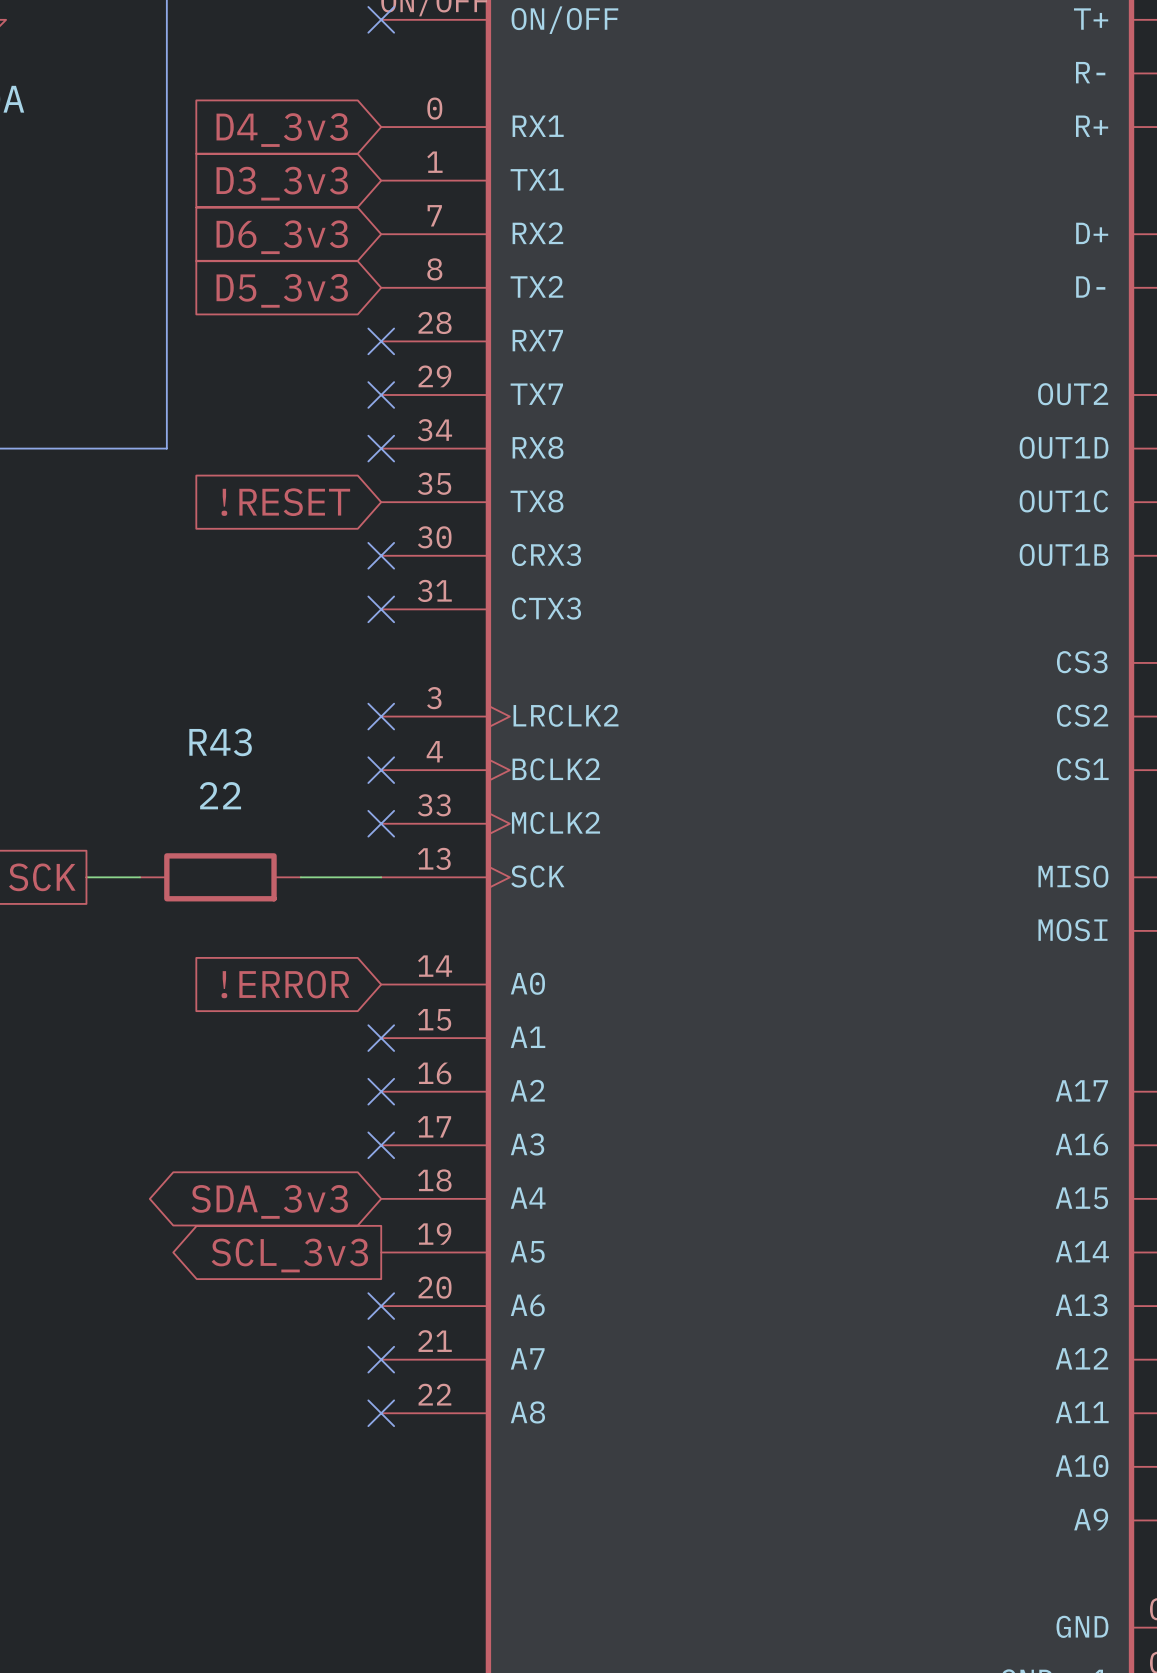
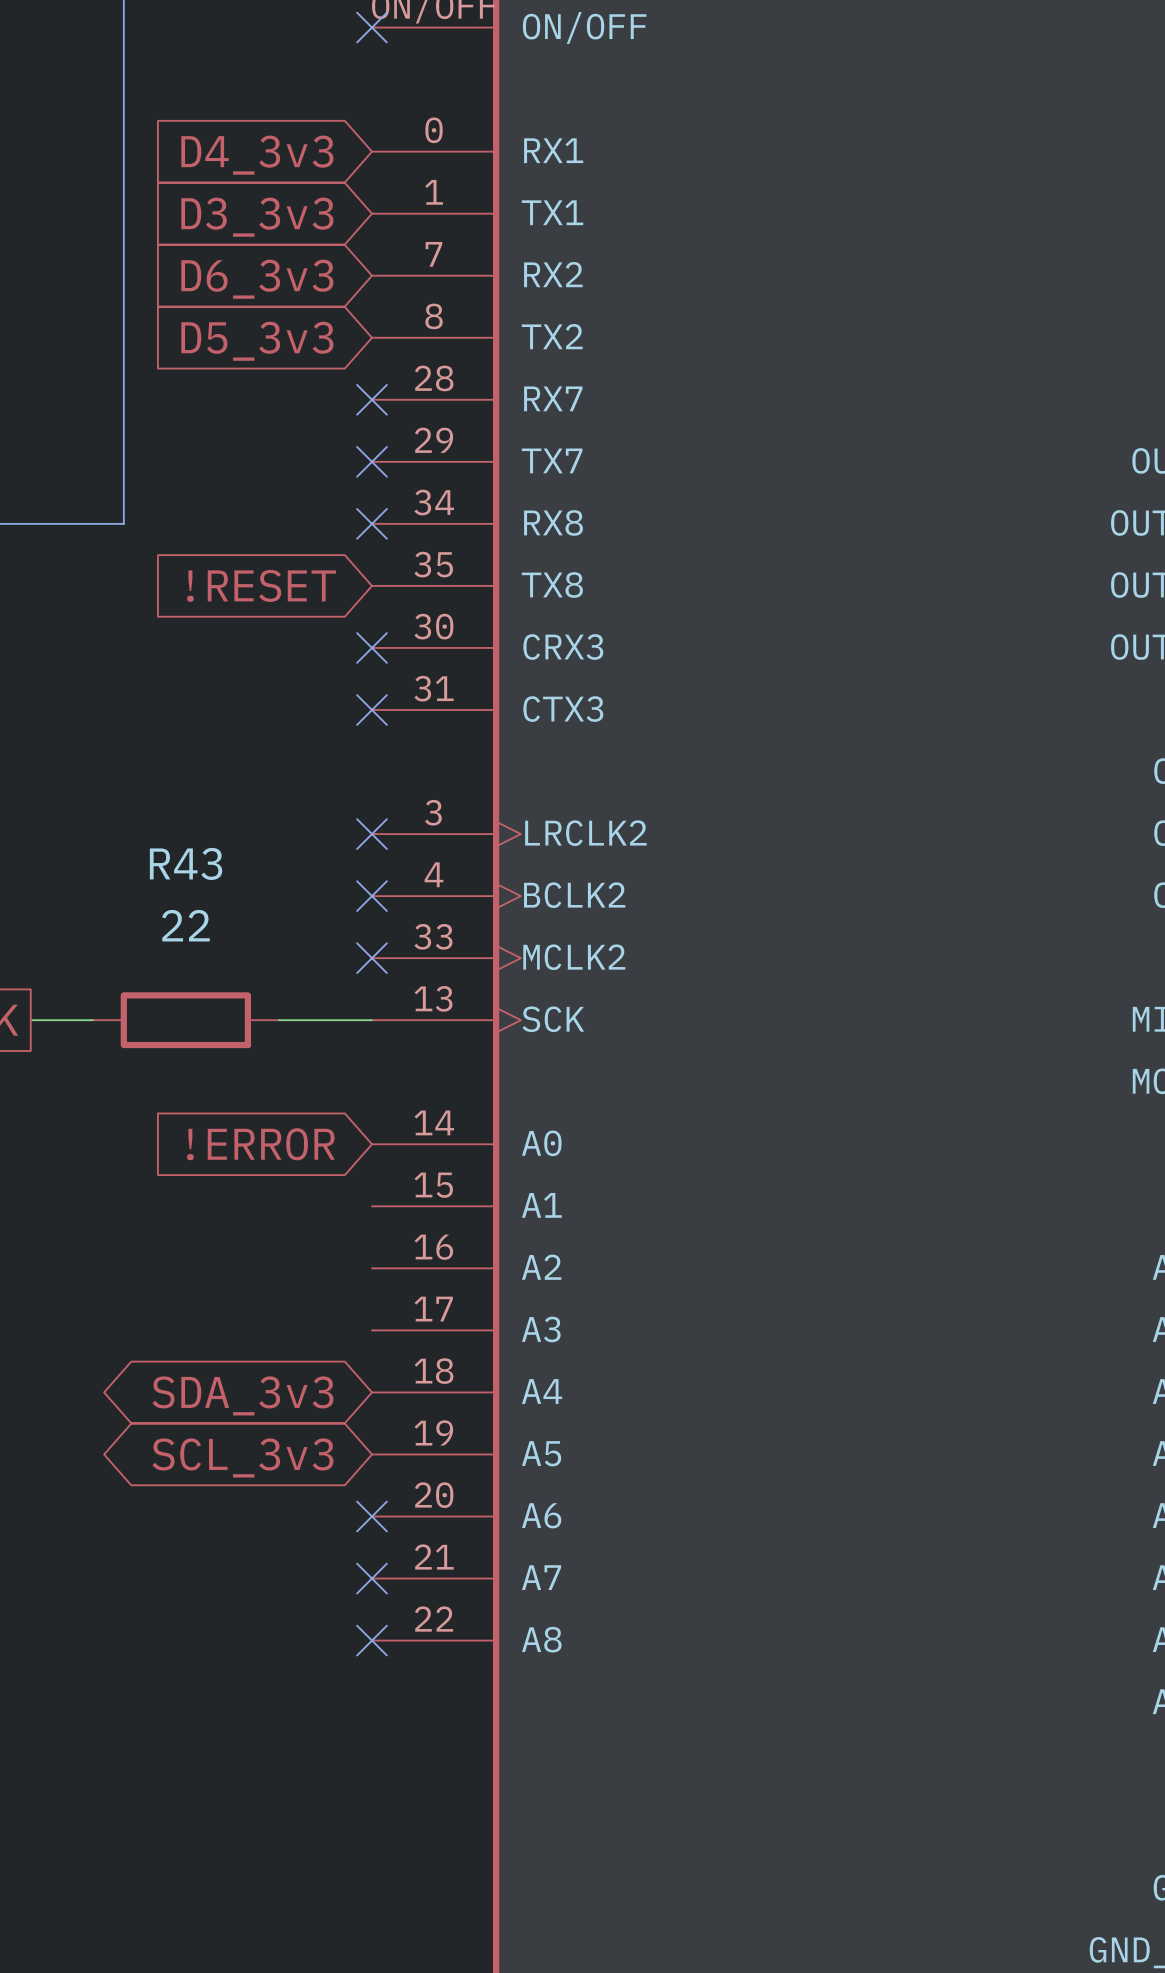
no-connect mark: (381, 1038) -> none
no-connect mark: (381, 1091) -> none
no-connect mark: (381, 1145) -> none
global label shape: output (289, 1255) -> bidirectional (242, 1457)

